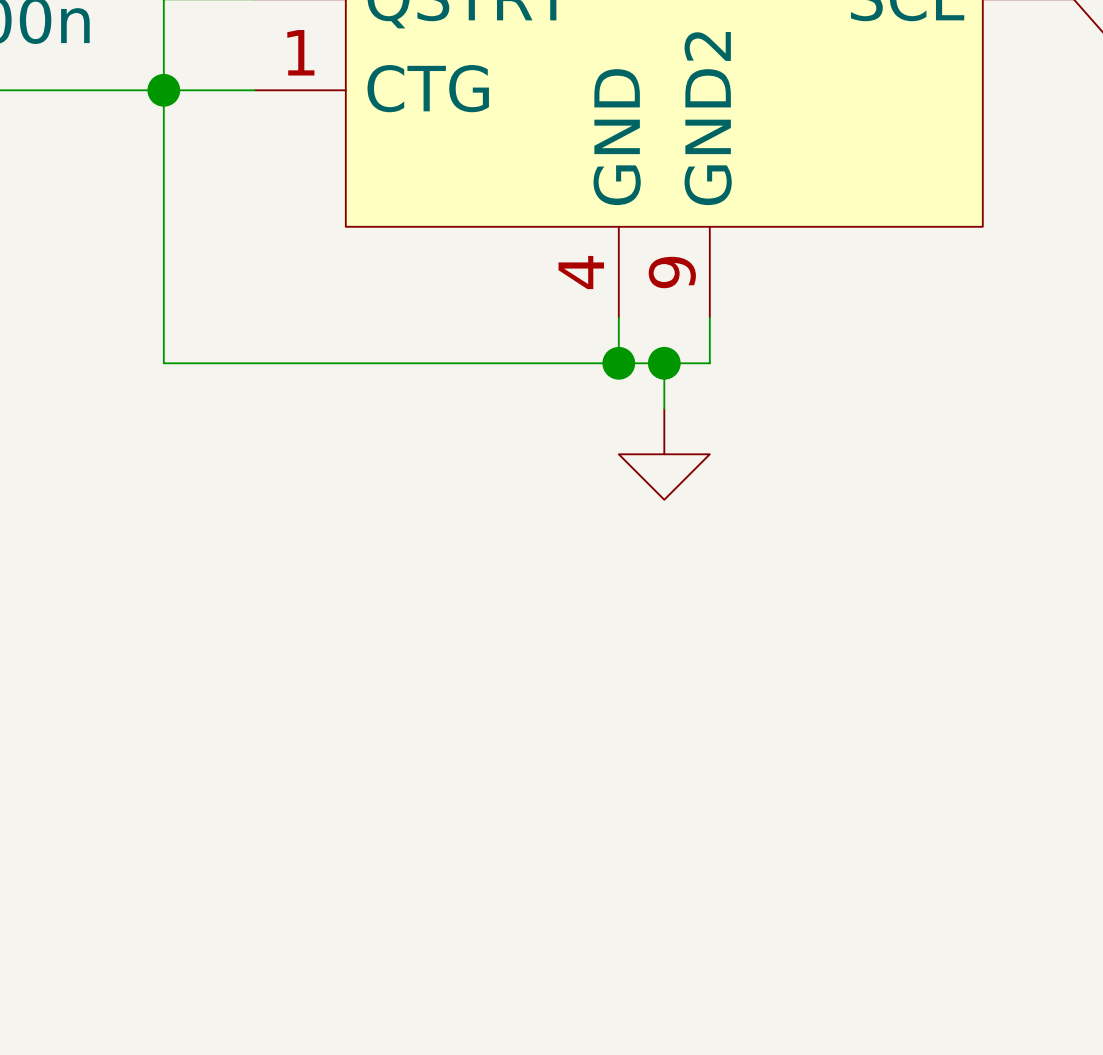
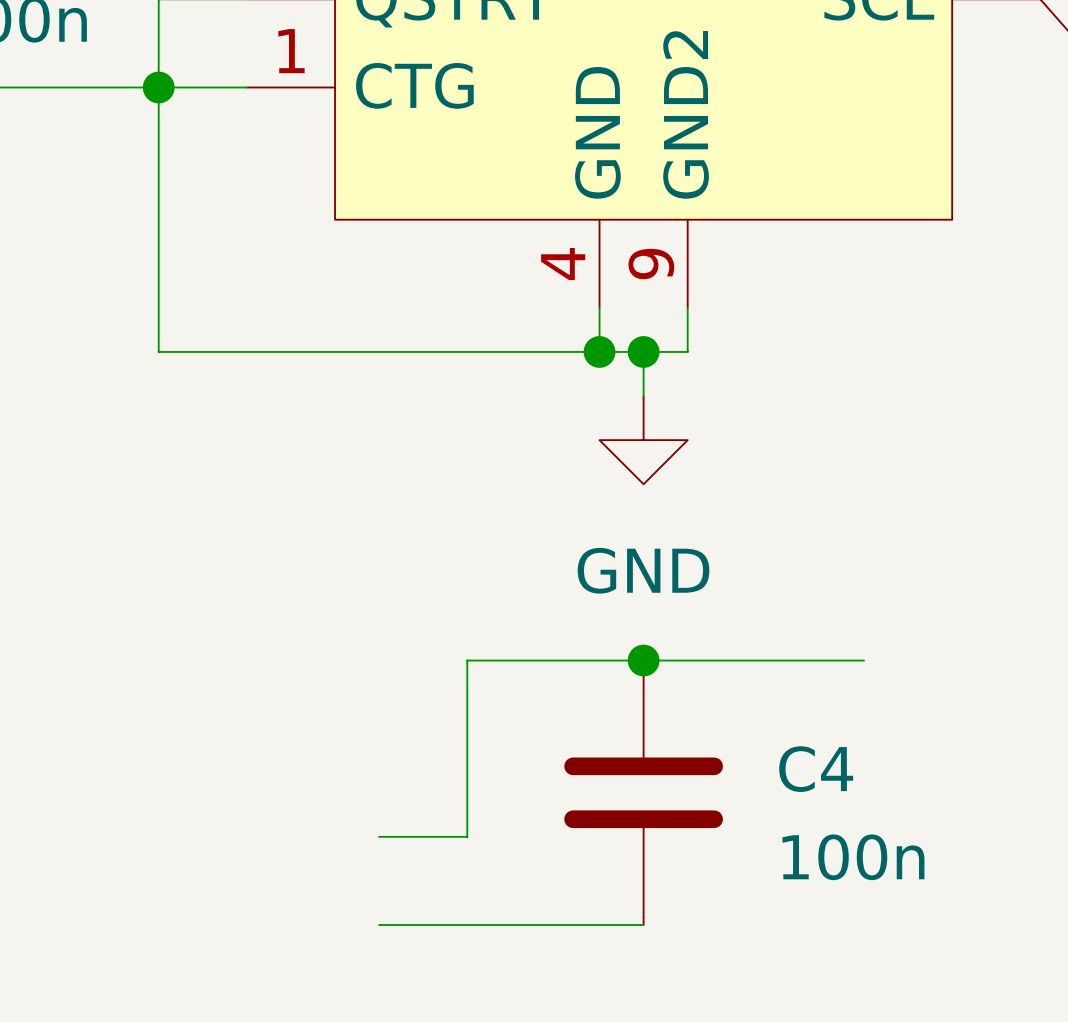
power symbol text: none -> GND (643, 570)
junction: none -> (643, 660)
wire: none -> (864, 660) (467, 660) (467, 836) (379, 836)
C4: none -> 100n (643, 792)
wire: none -> (379, 925) (643, 925)

